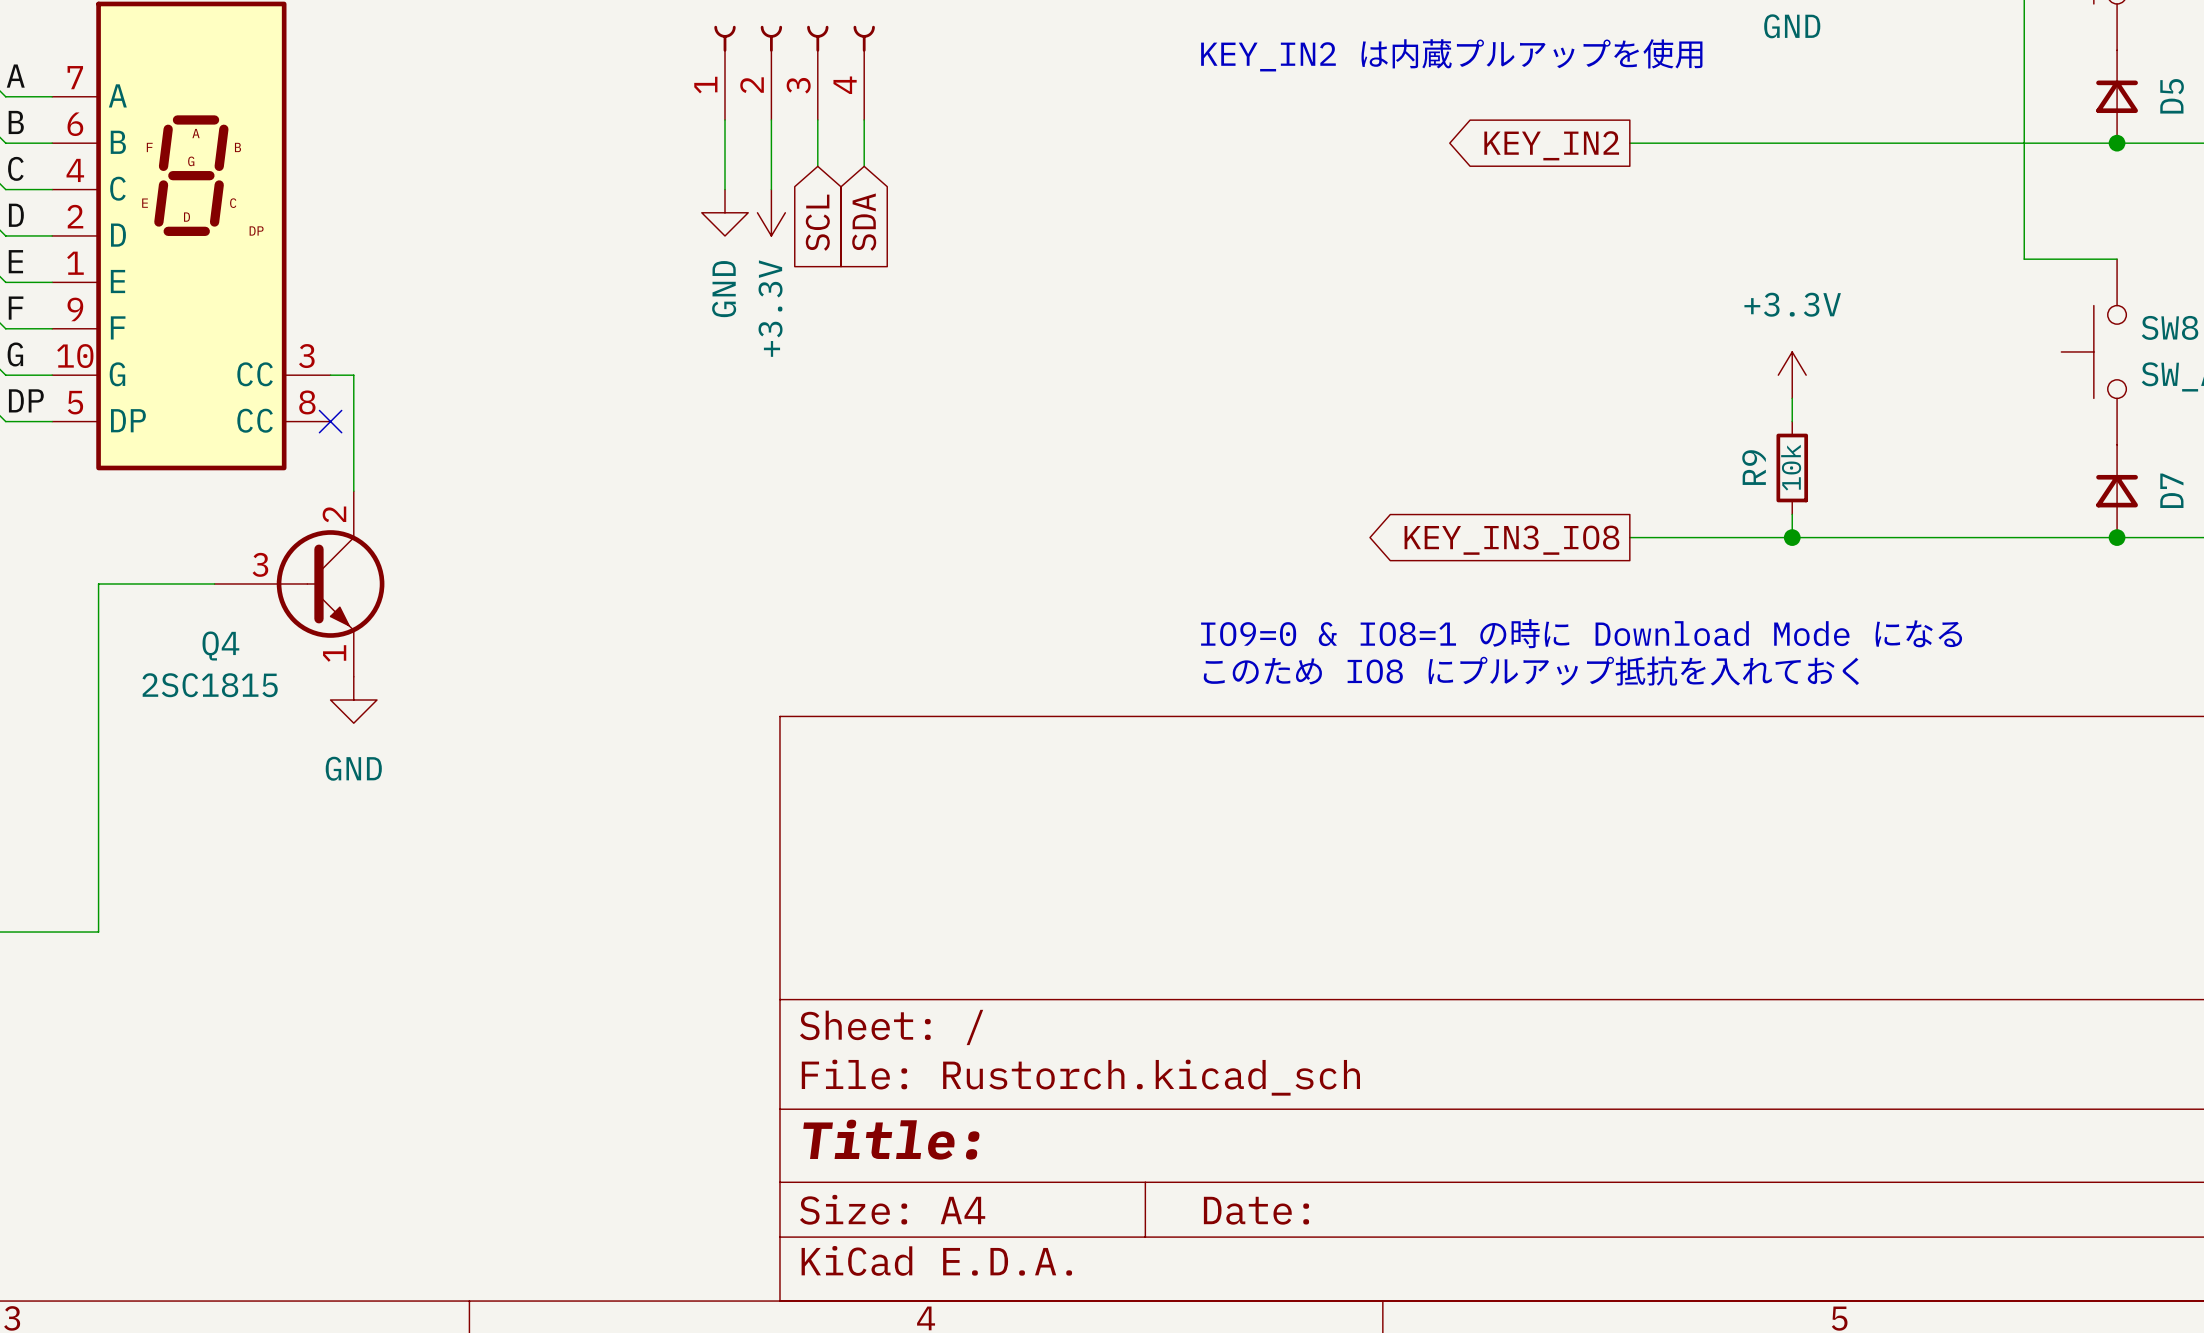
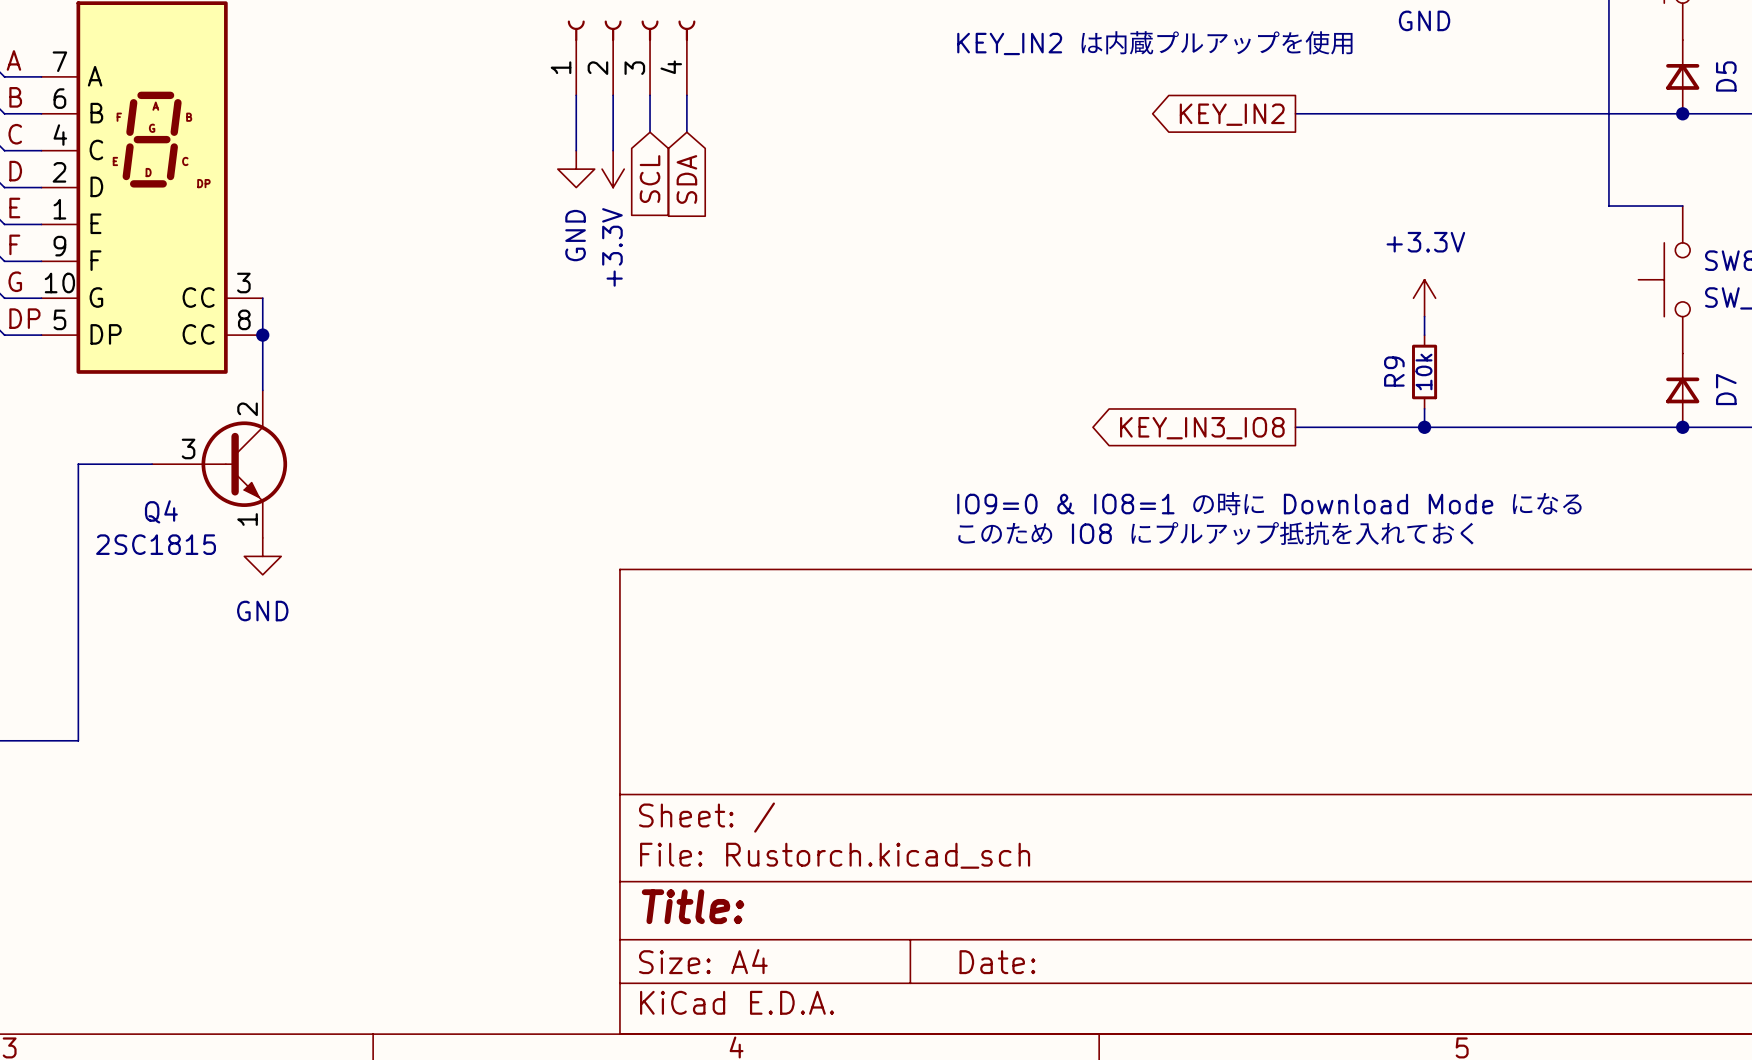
wire: (330, 375) (353, 375) (353, 491) -> (262, 298) (262, 390)
no-connect mark: (330, 421) -> none
junction: none -> (262, 335)
Q4 position: (299, 583) -> (219, 464)
power symbol position: GND (353, 700) -> GND (262, 556)

